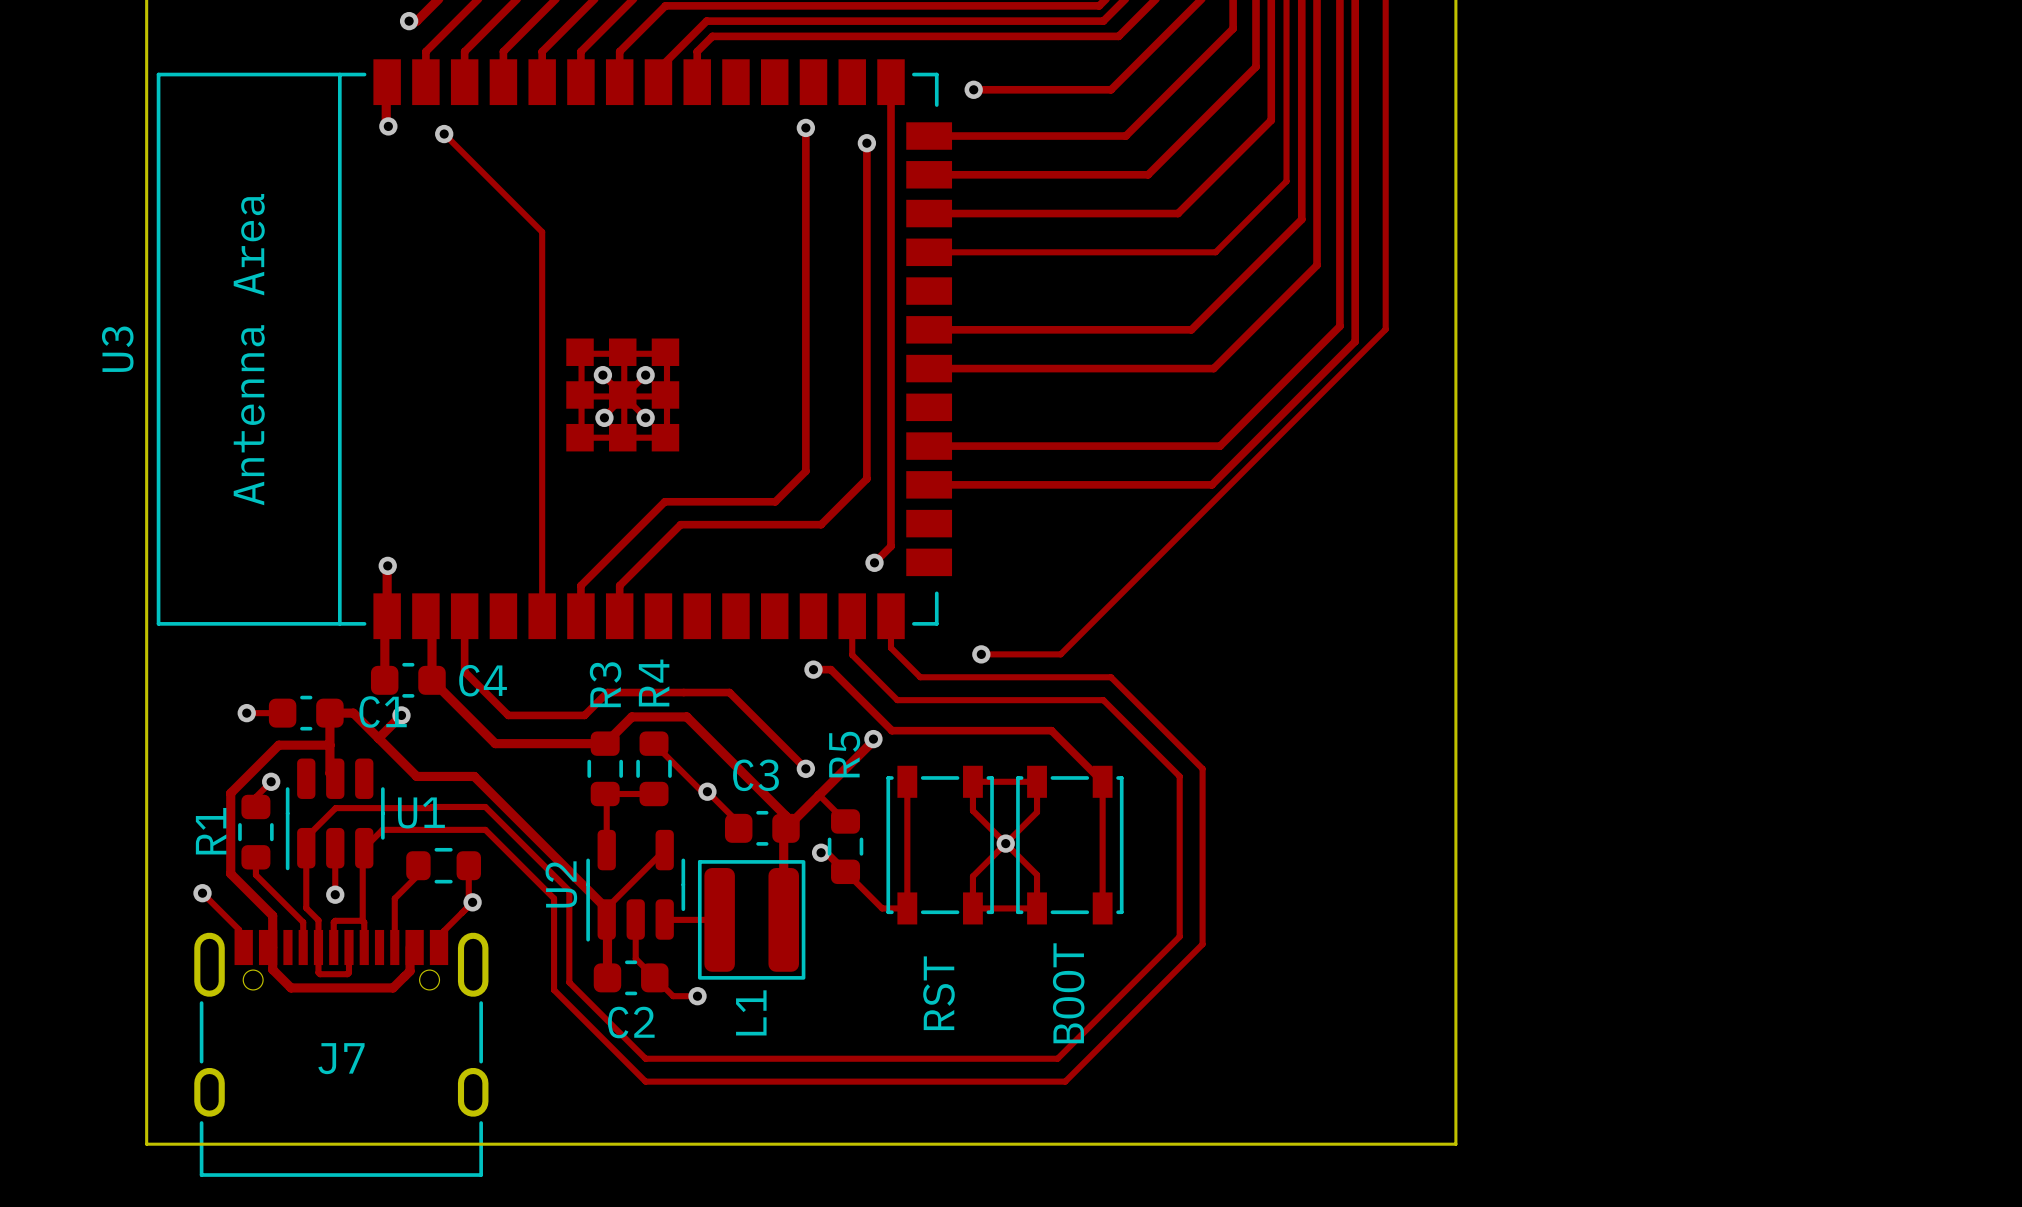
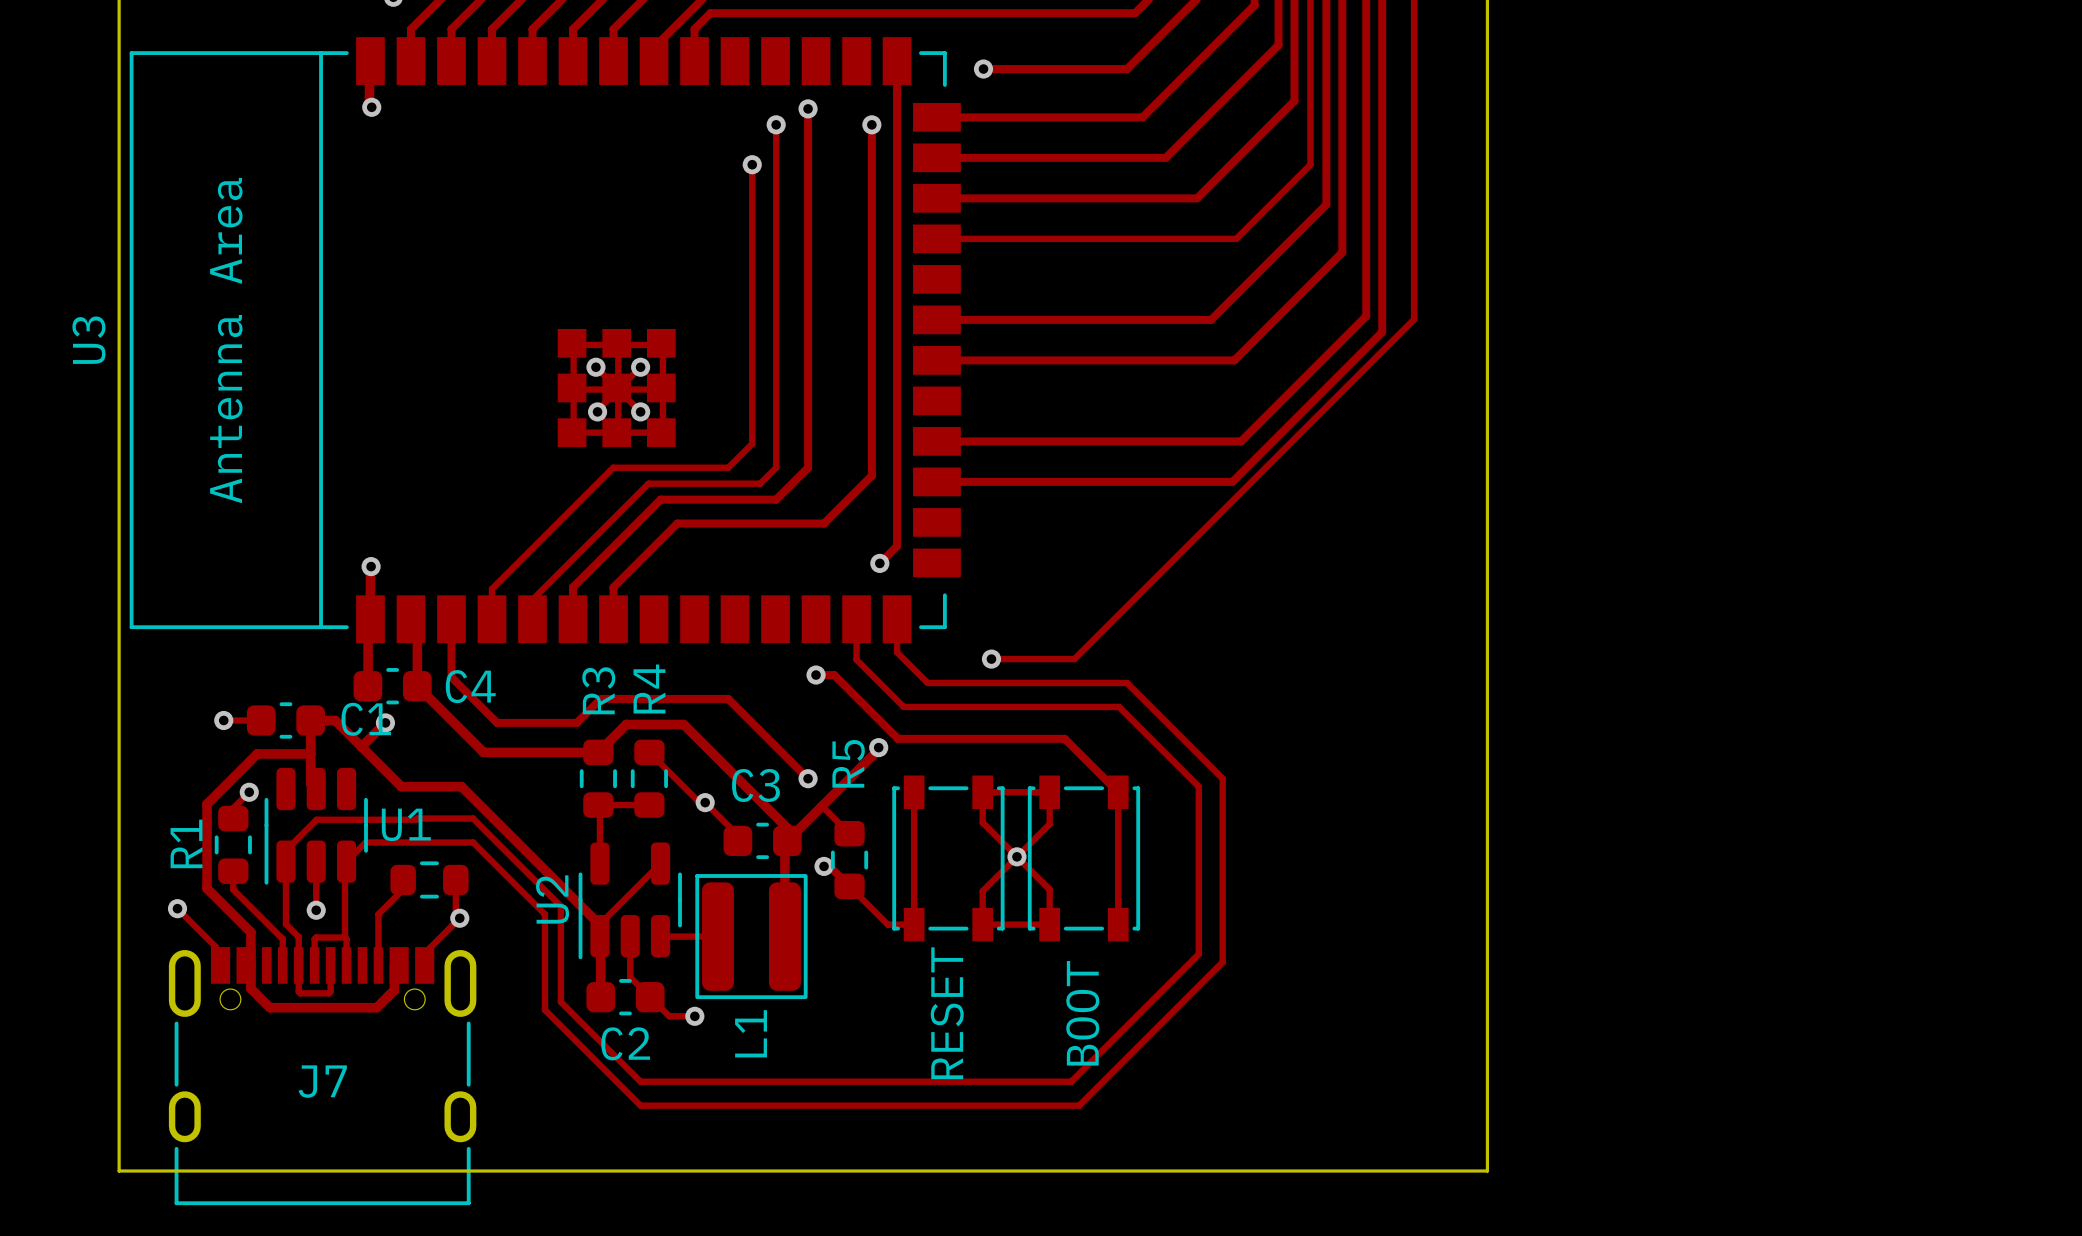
track: (444, 134) (542, 232) (542, 597) -> (776, 124) (776, 467) (760, 483) (648, 483) (532, 599)
via: (444, 134) -> none
via: none -> (776, 124)
track: none -> (752, 164) (752, 443) (728, 467) (613, 467) (491, 588) (491, 619)
via: none -> (752, 164)
part value: RST (938, 993) -> RESET (947, 1013)

